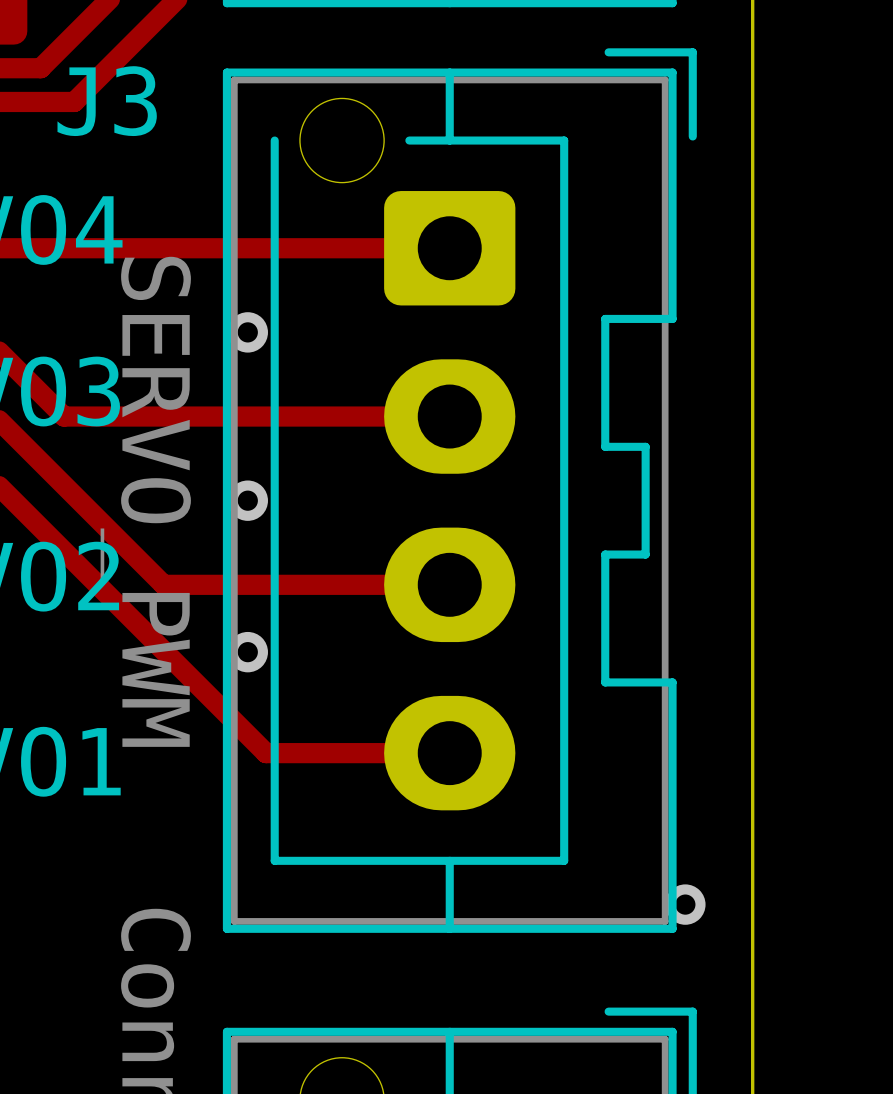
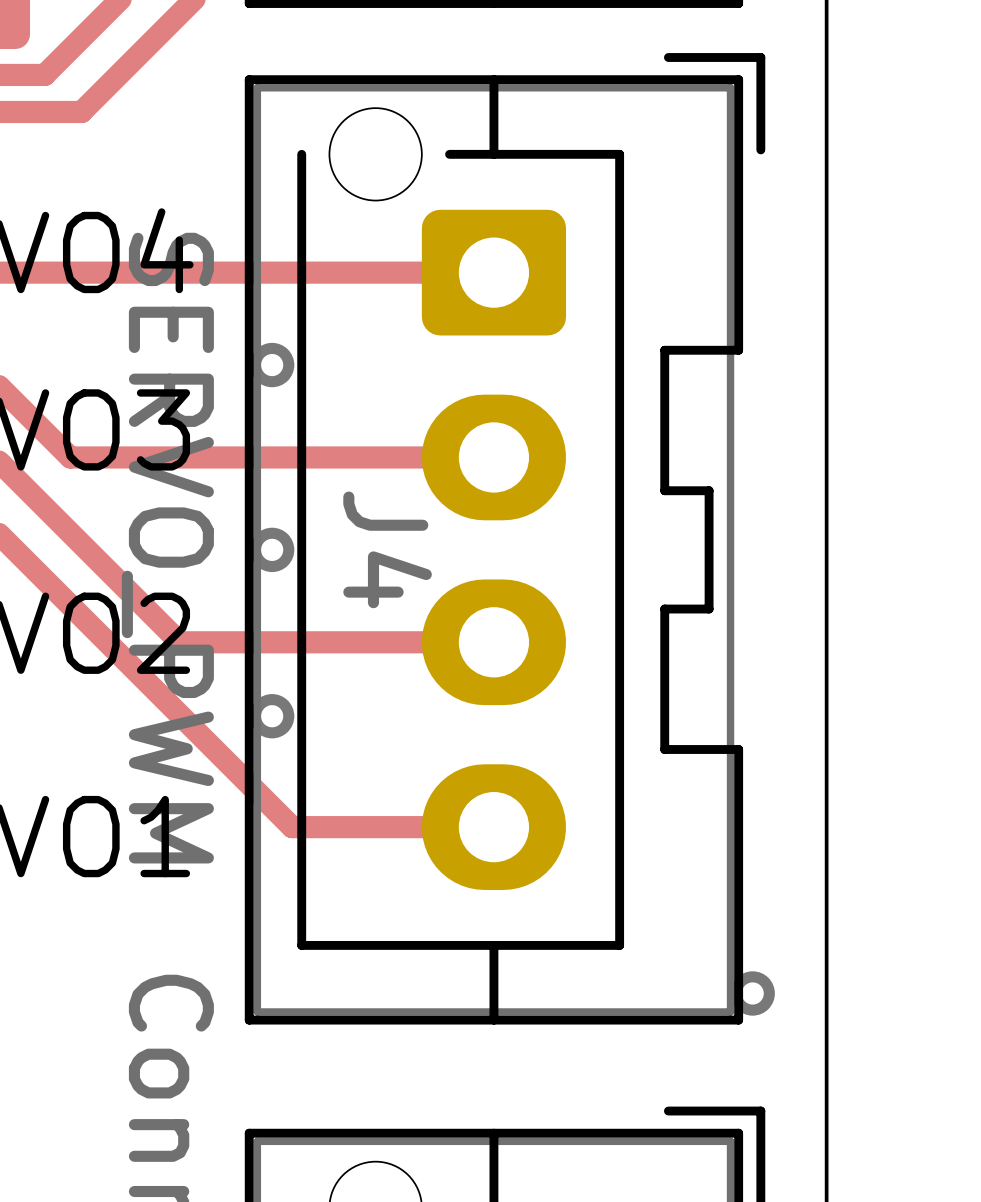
J3 name: J3 (107, 101) -> J4 (387, 549)

